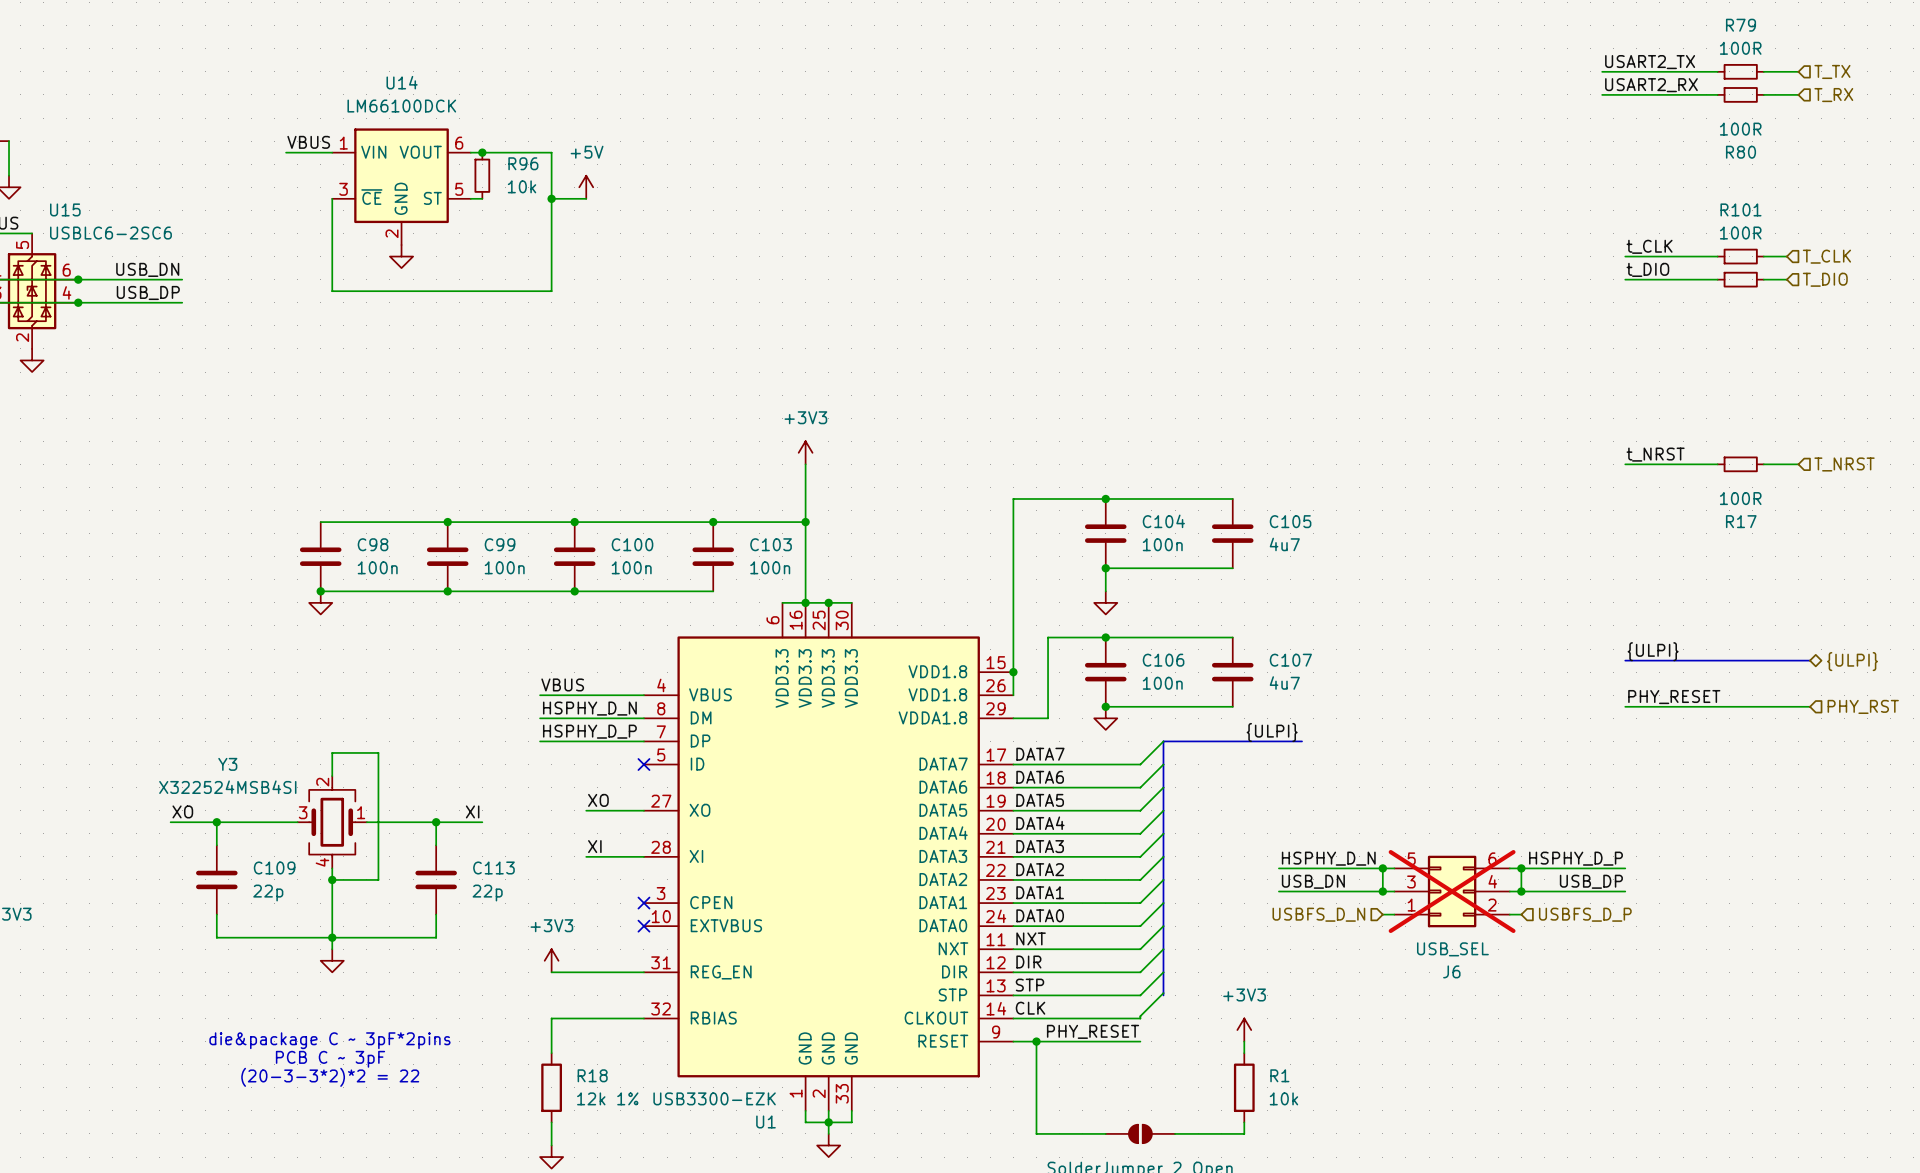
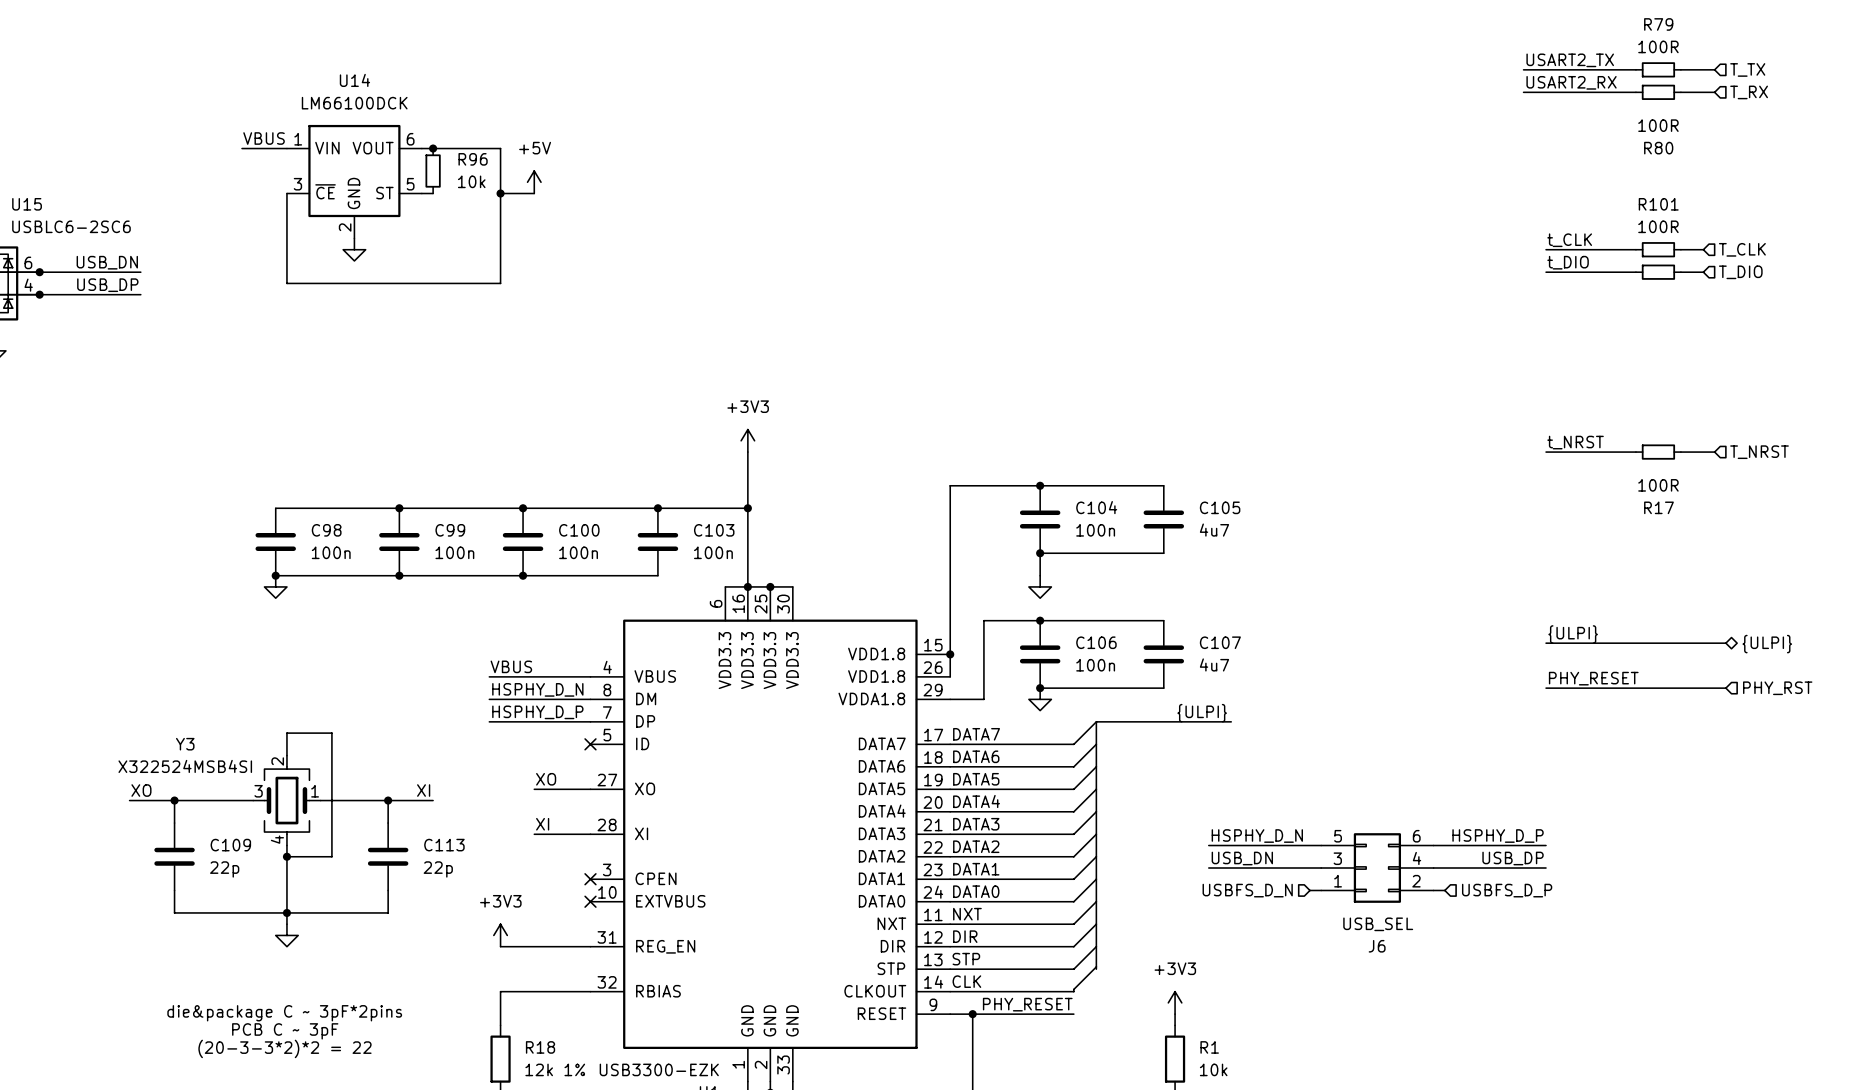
wire: (1382, 868) (1382, 891) -> none
junction: (1382, 868) -> none
wire: (1521, 868) (1521, 891) -> none
junction: (1521, 868) -> none
junction: (1382, 891) -> none
J6 do-not-place cross: (1452, 891) -> none
junction: (1521, 891) -> none

